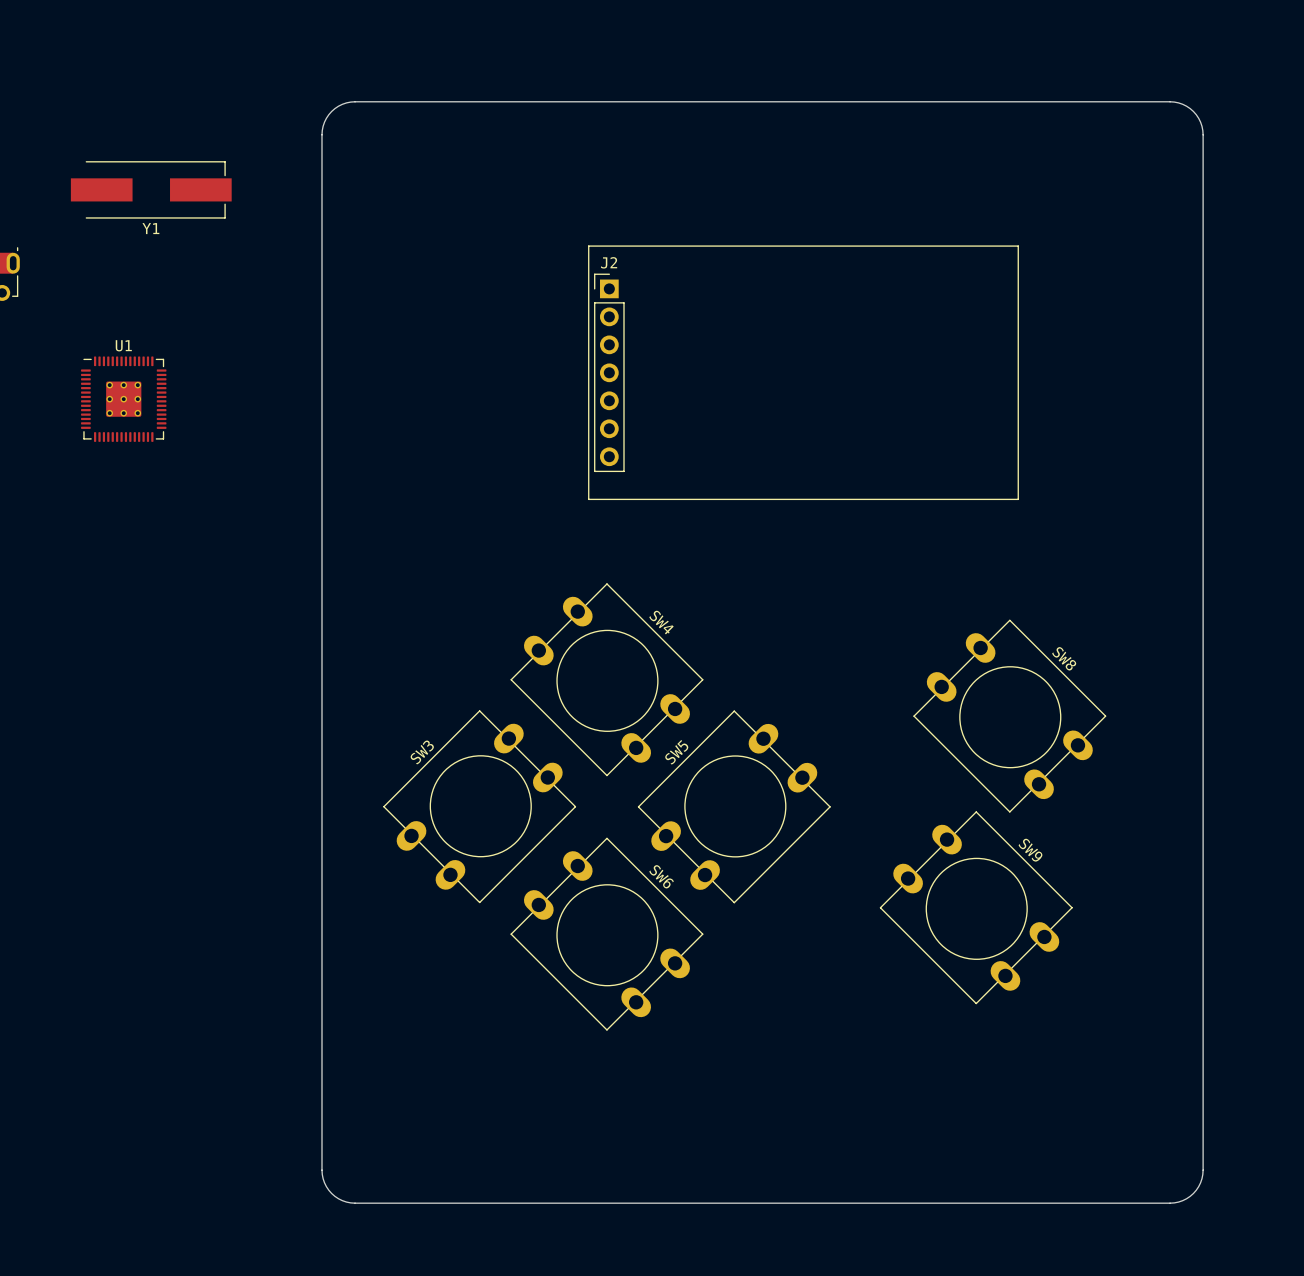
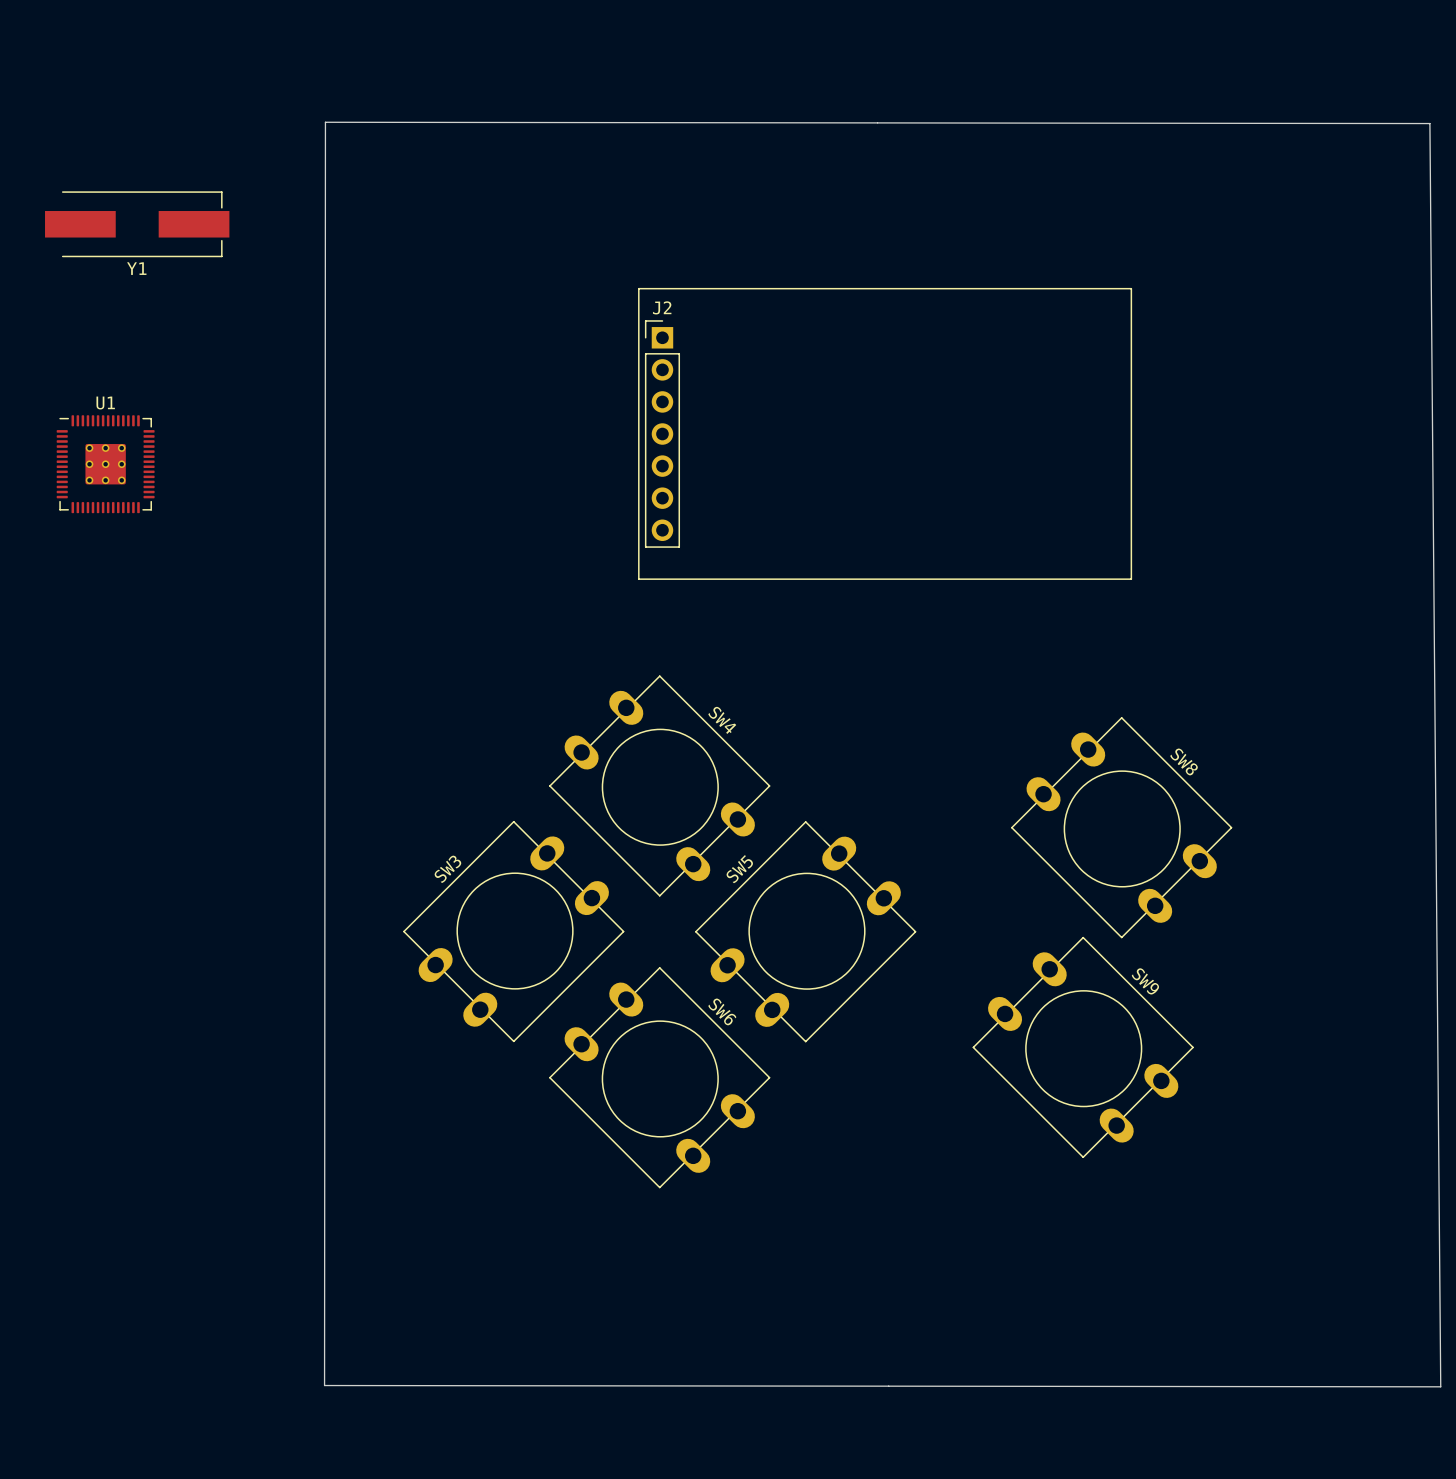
board edge: (355, 101) (1170, 101) (1186, 106) (1196, 114) (1200, 122) (1203, 134) (1203, 1170) (1200, 1182) (1190, 1196) (1178, 1202) (1170, 1203) (355, 1203) (342, 1200) (328, 1190) (323, 1178) (322, 1170) (322, 134) (324, 122) (331, 111) (342, 104) (355, 101) -> none
board edge: none -> (877, 122) (325, 122) (324, 1385) (1440, 1386) (1429, 123) (877, 122)

